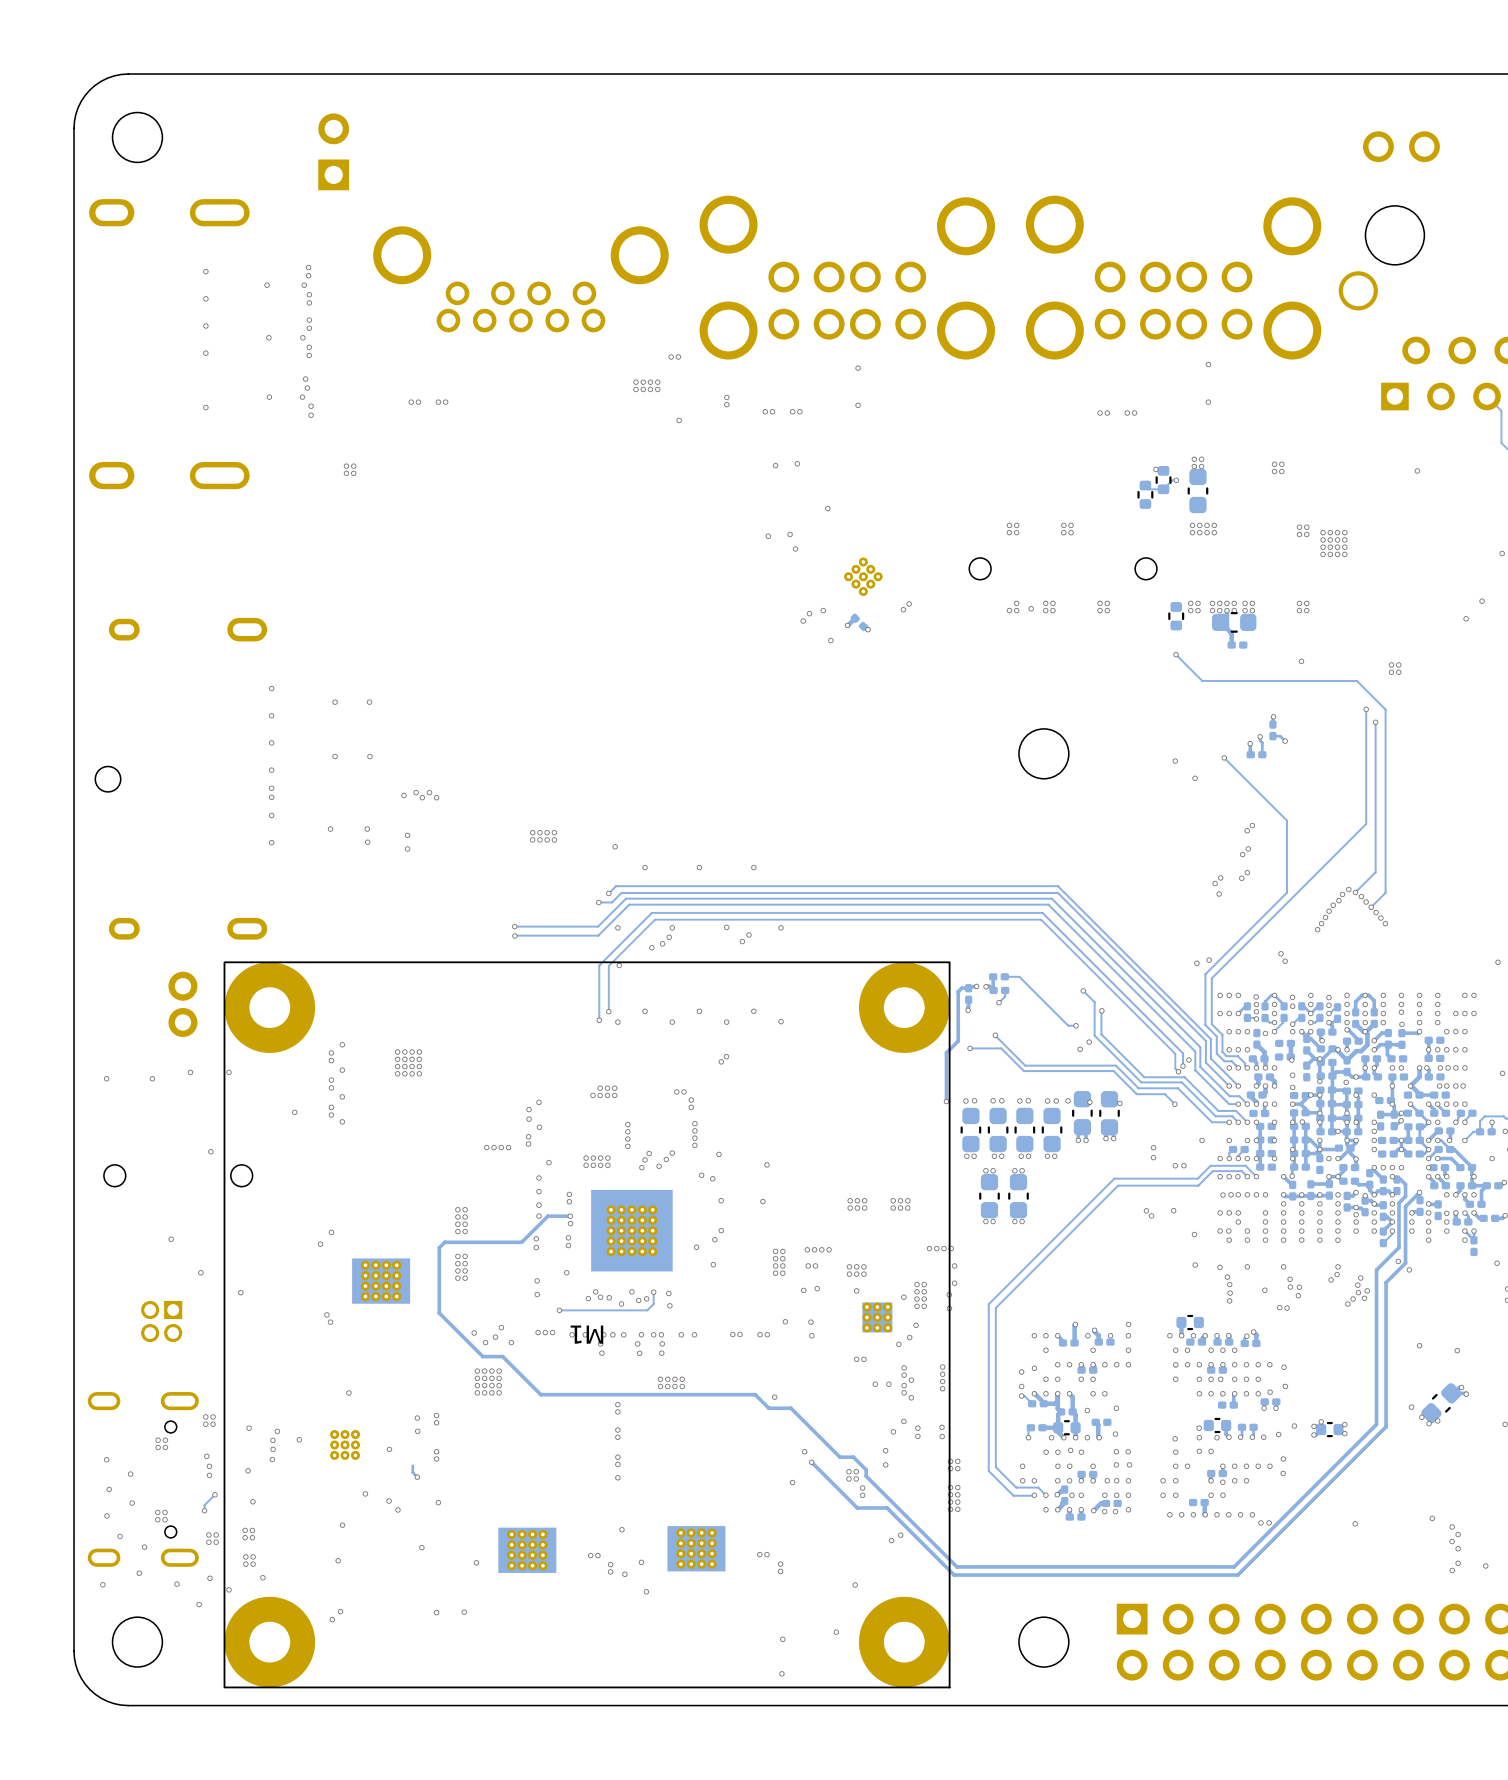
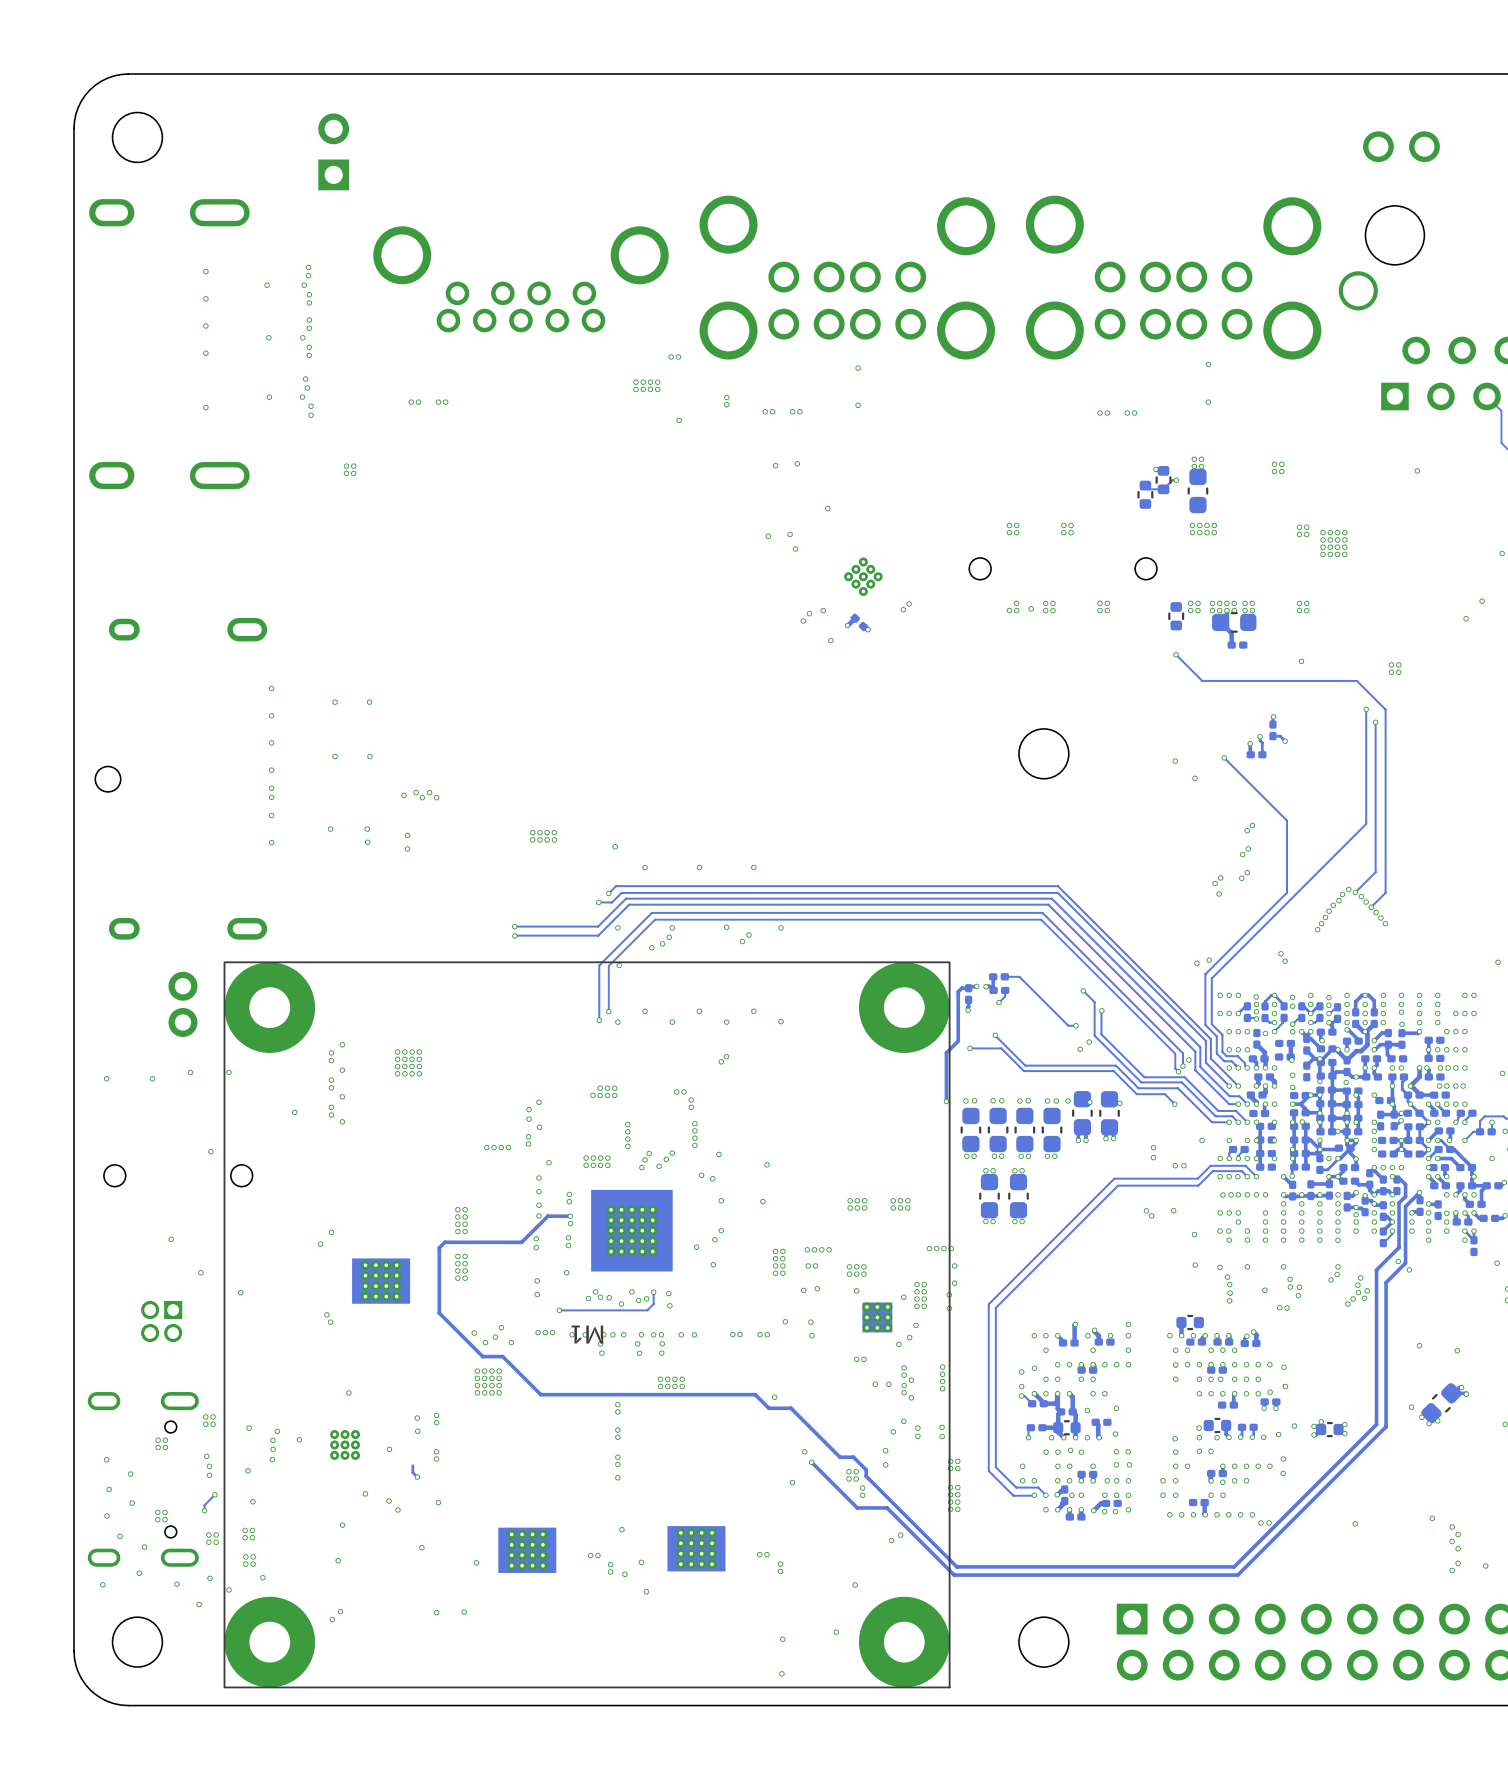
track: none -> (1404, 1076) (1402, 1089) (1407, 1095) (1407, 1101) (1410, 1104)
track: none -> (1338, 1158) (1327, 1169) (1319, 1169)

